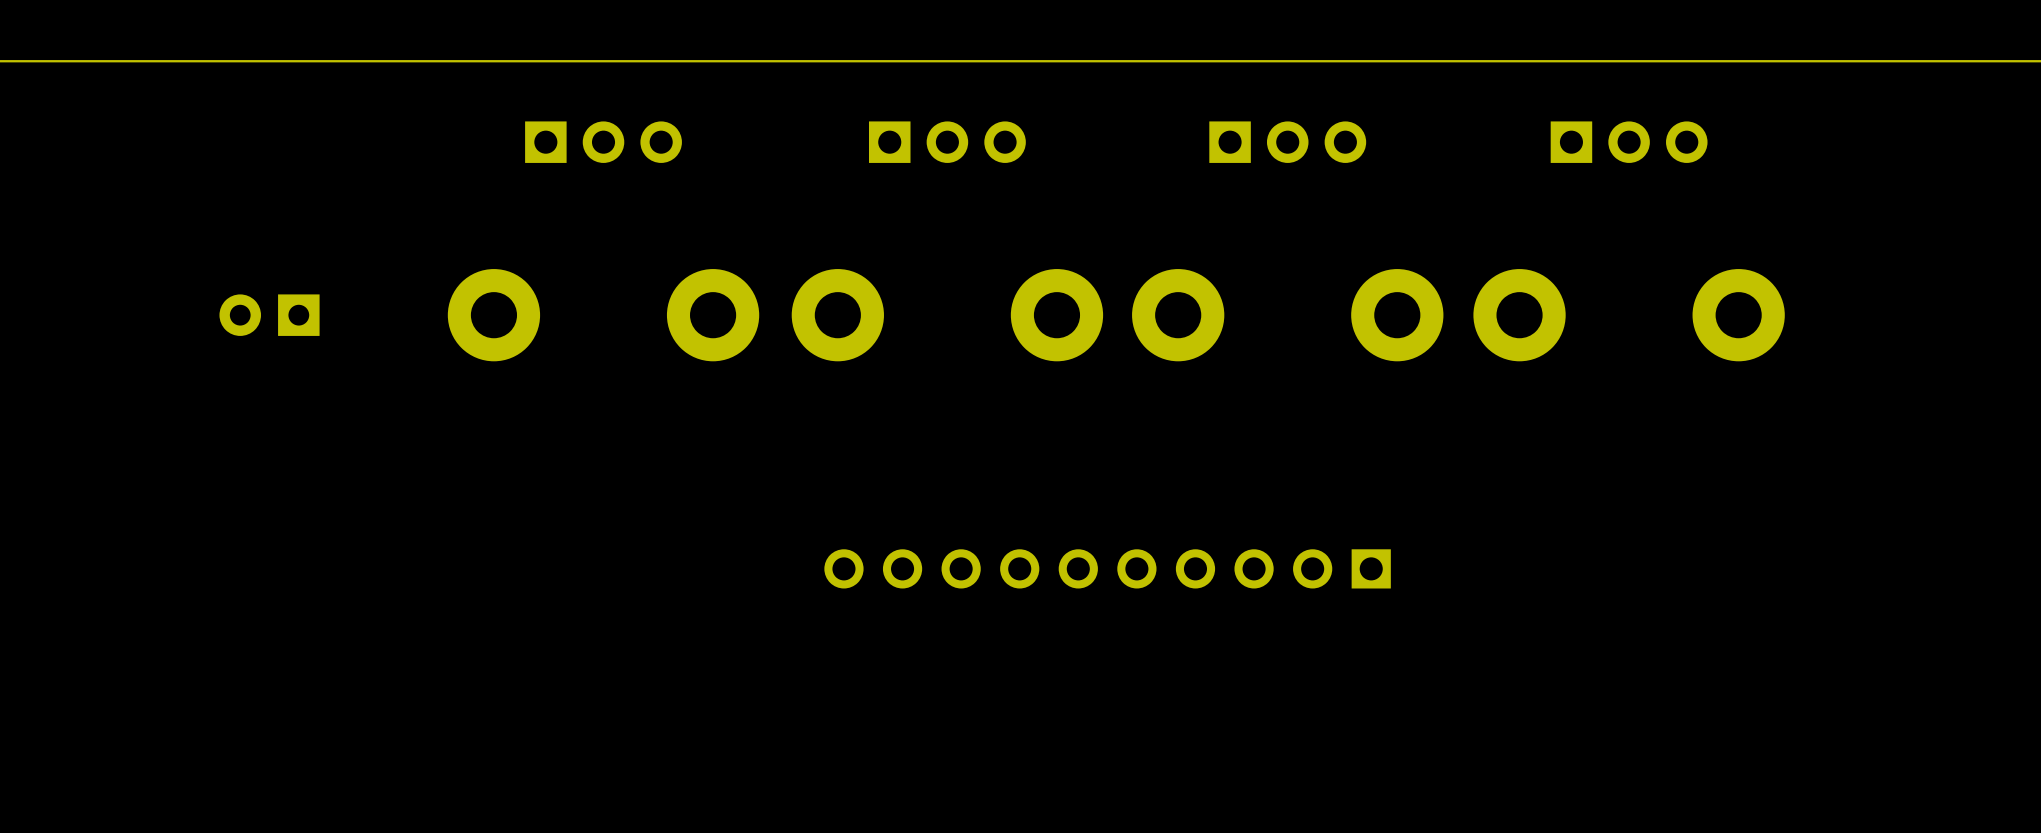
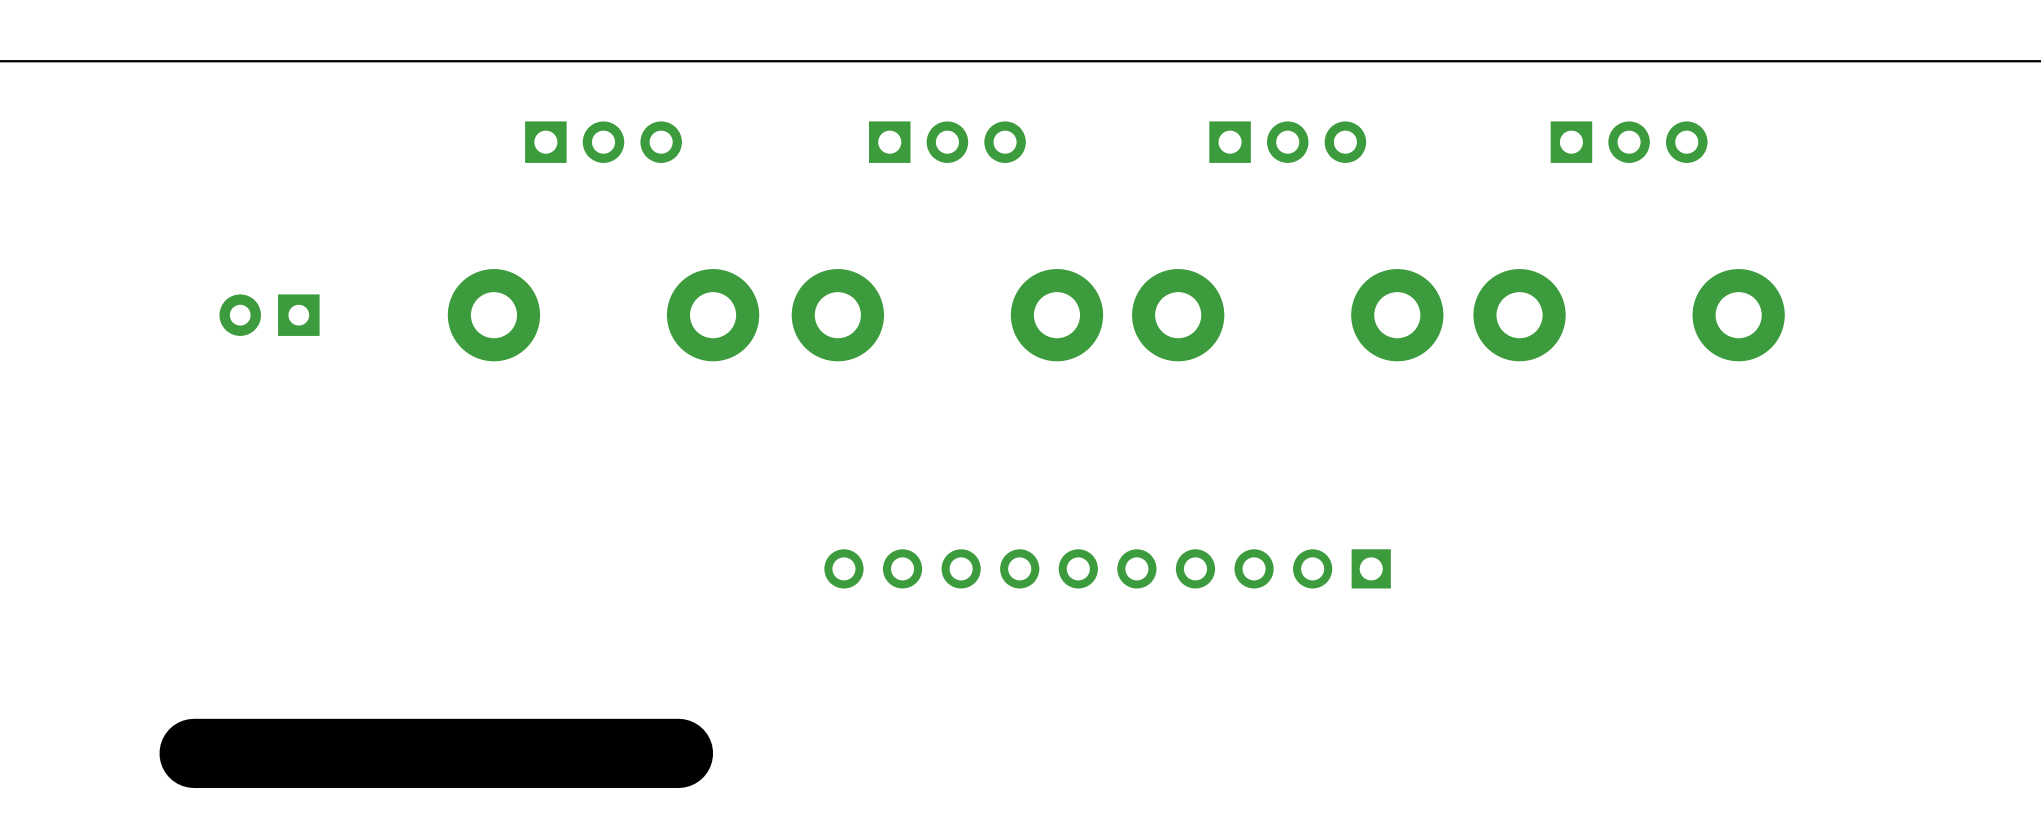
board edge: none -> (678, 753) (194, 753)

